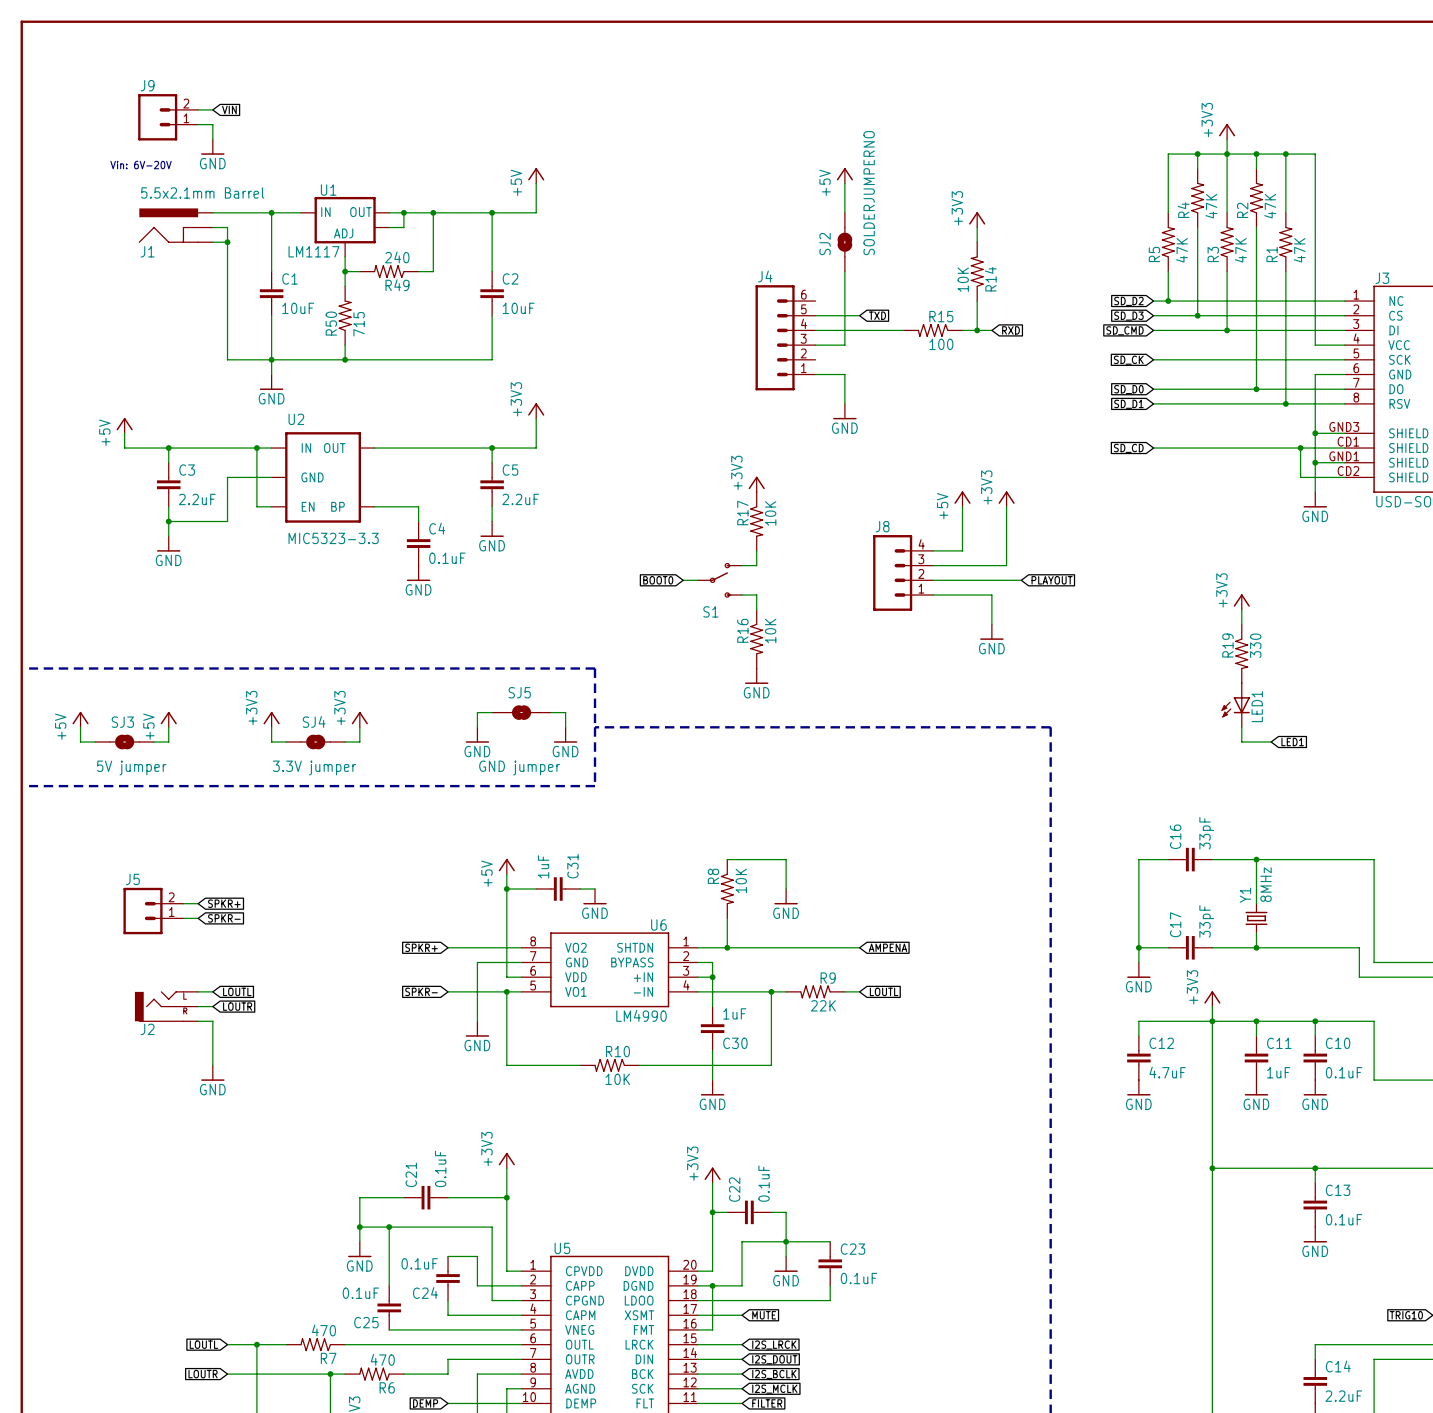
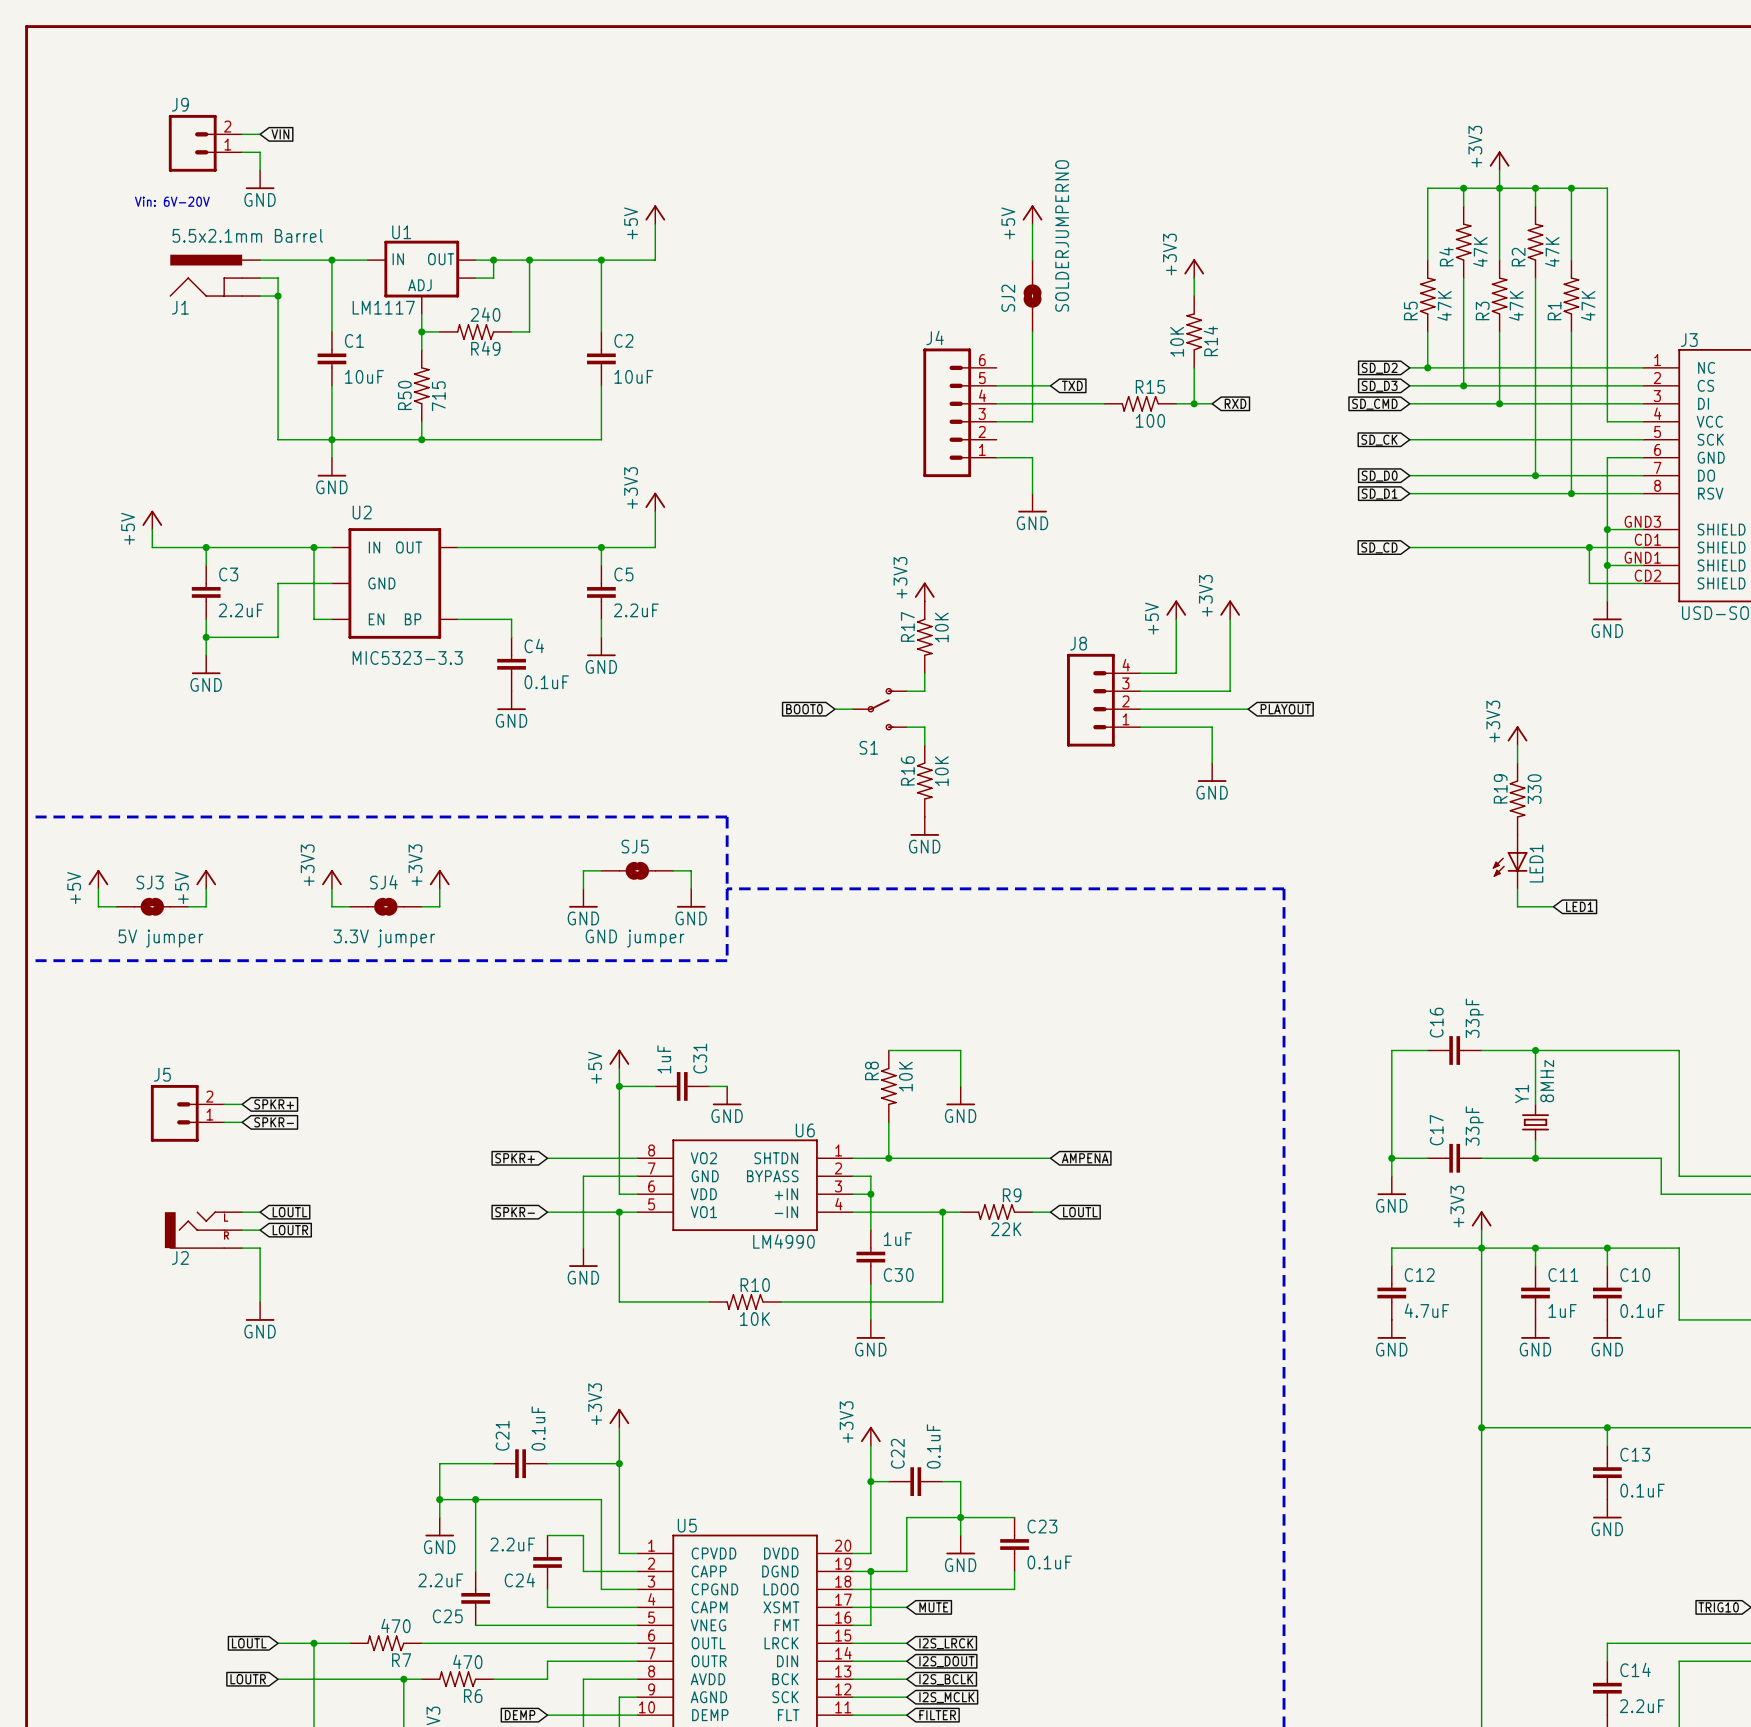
C24 value: 0.1uF (419, 1263) -> 2.2uF (512, 1544)
C25 value: 0.1uF (360, 1293) -> 2.2uF (440, 1580)

